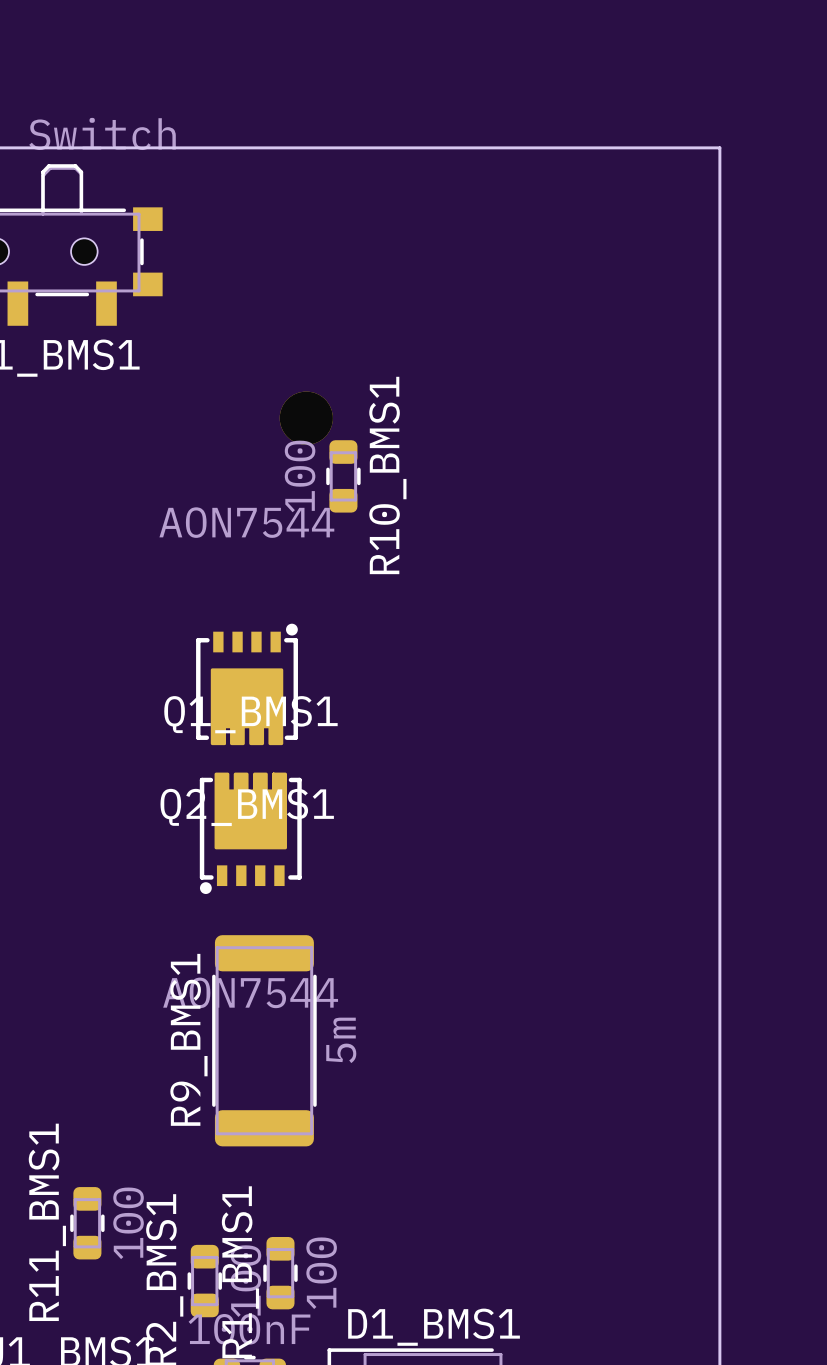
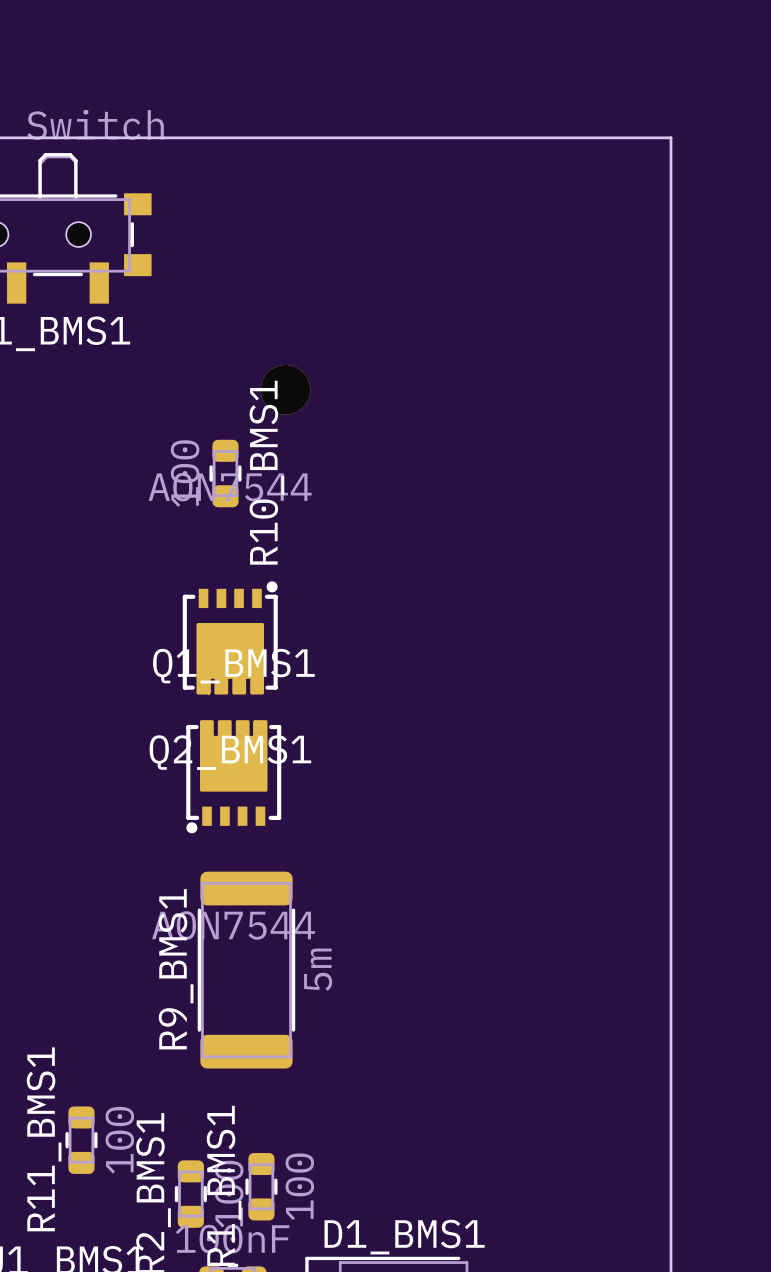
R10_BMS1 position: (343, 476) -> (225, 473)

